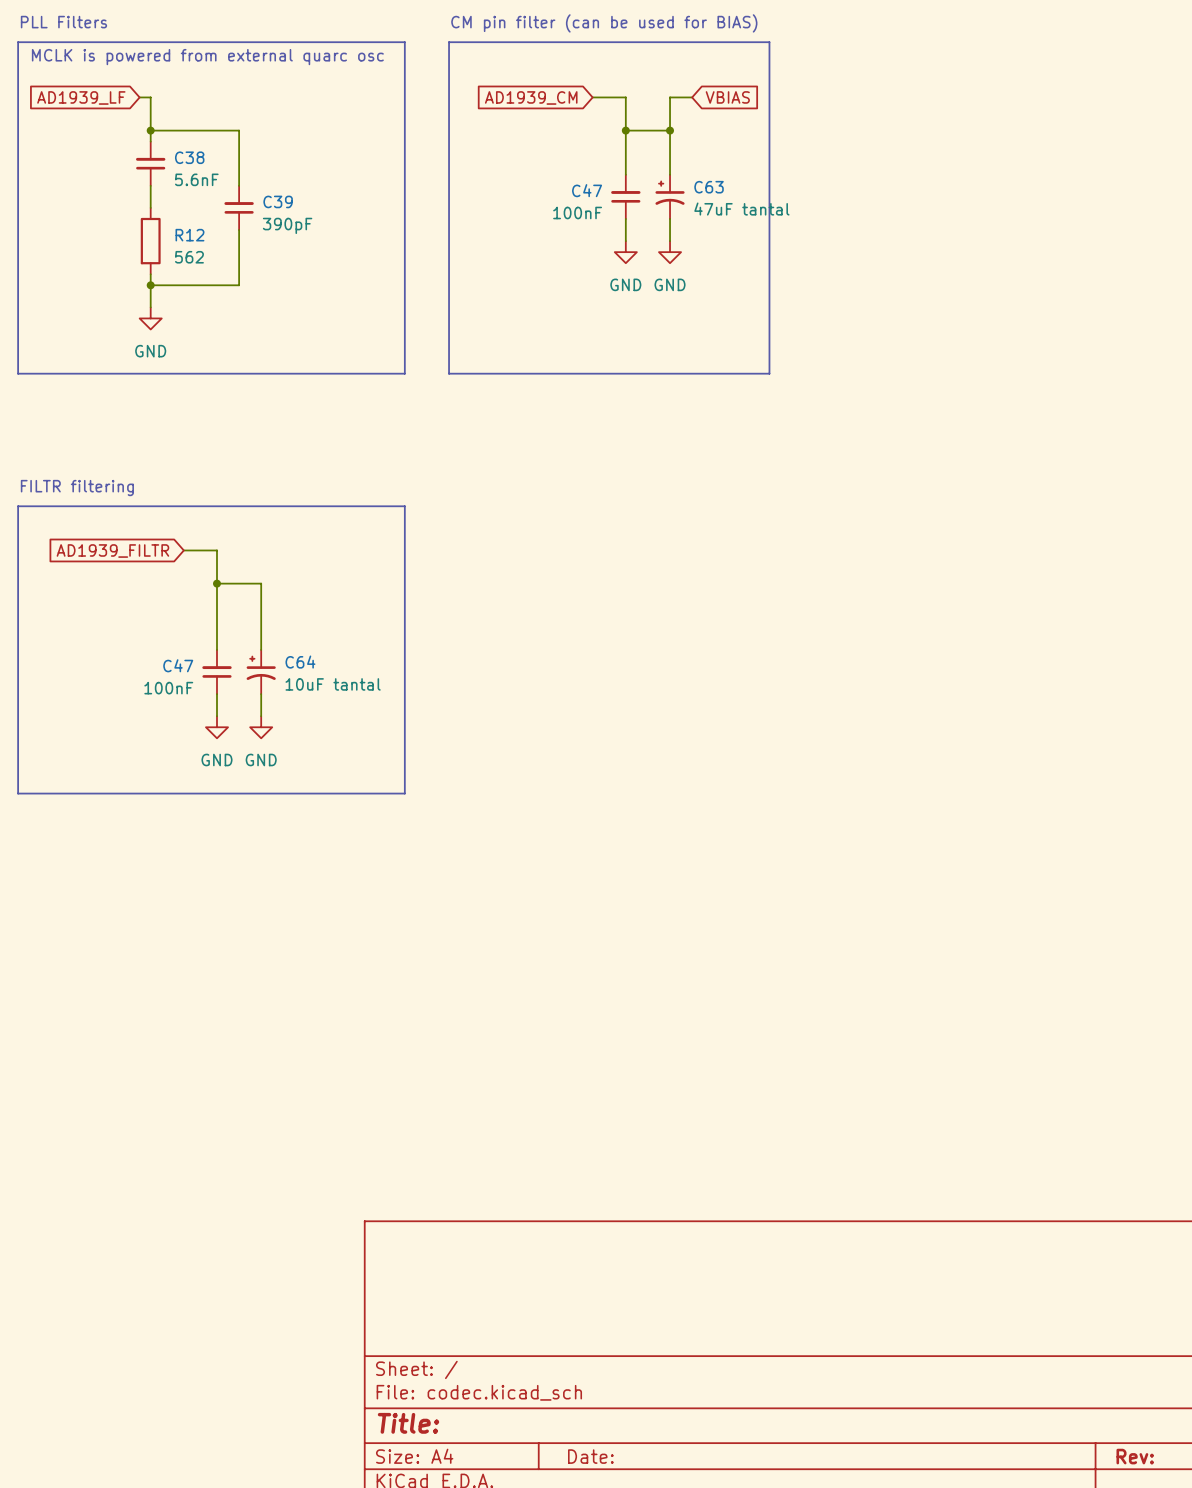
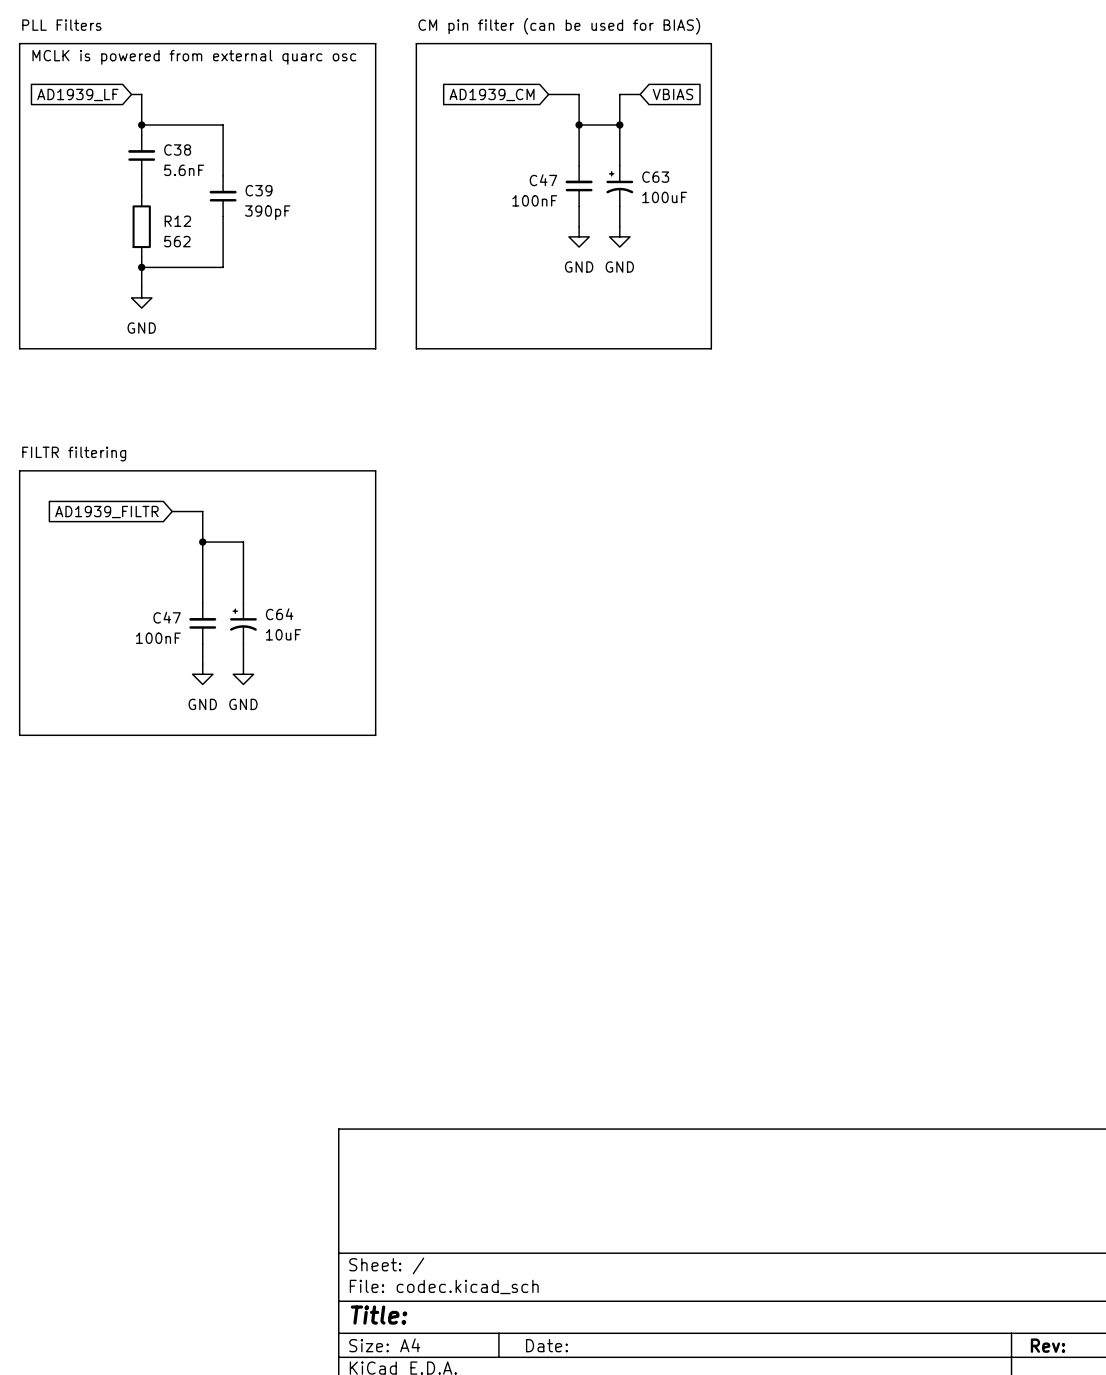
C63 value: 47uF tantal (741, 209) -> 100uF (664, 197)
C64 value: 10uF tantal (333, 684) -> 10uF (283, 634)

